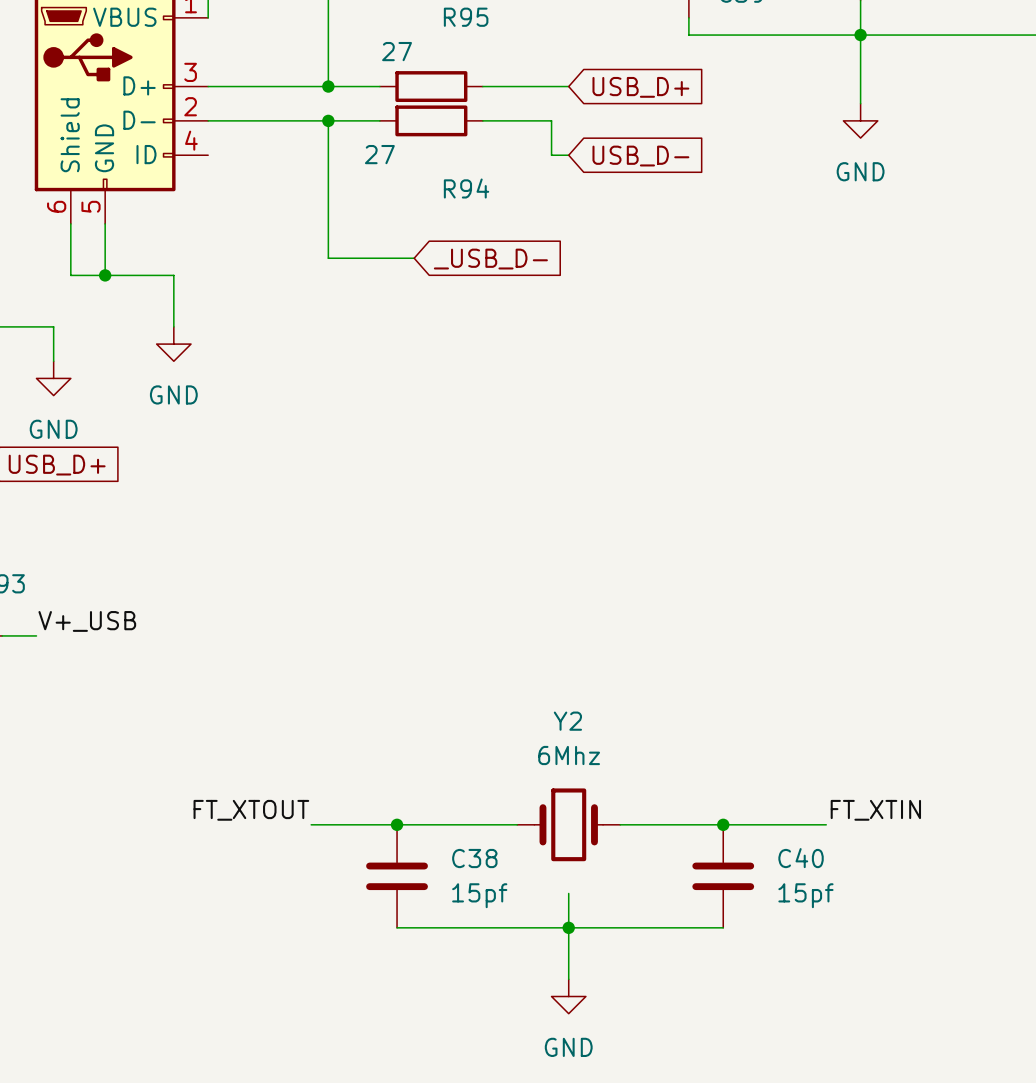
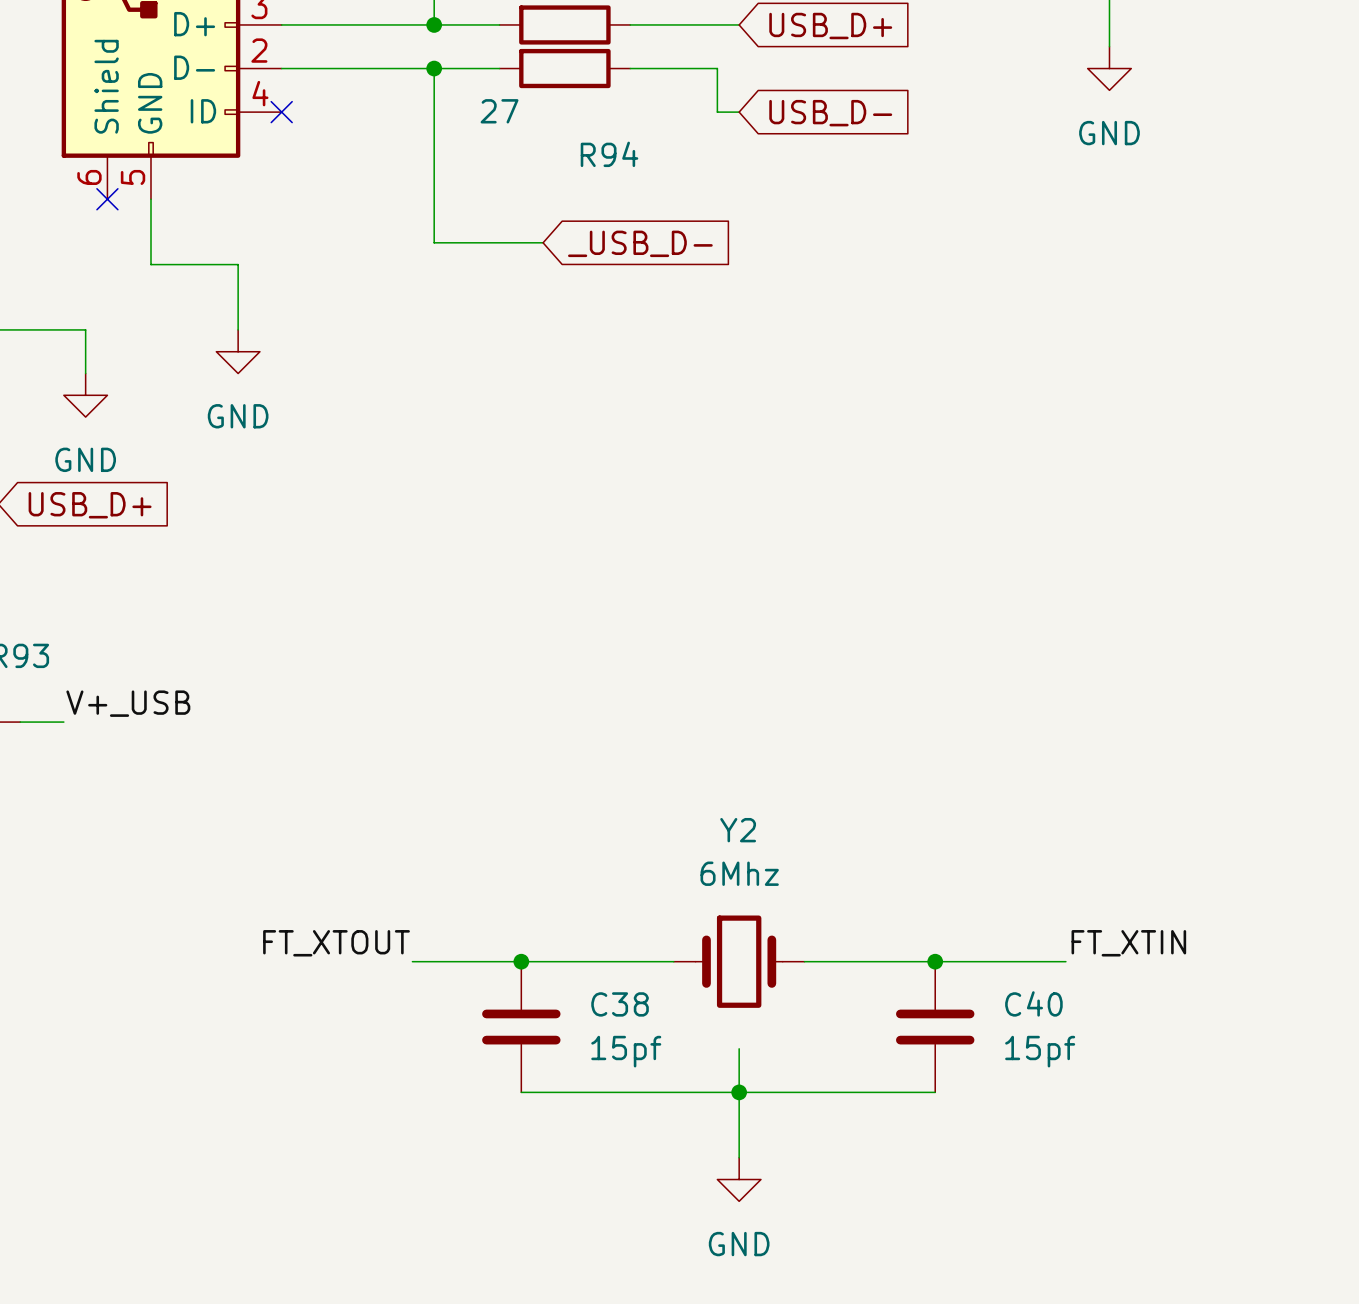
no-connect mark: none -> (281, 112)
wire: (70, 223) (70, 275) (105, 275) -> none
no-connect mark: none -> (107, 199)
junction: (105, 275) -> none

